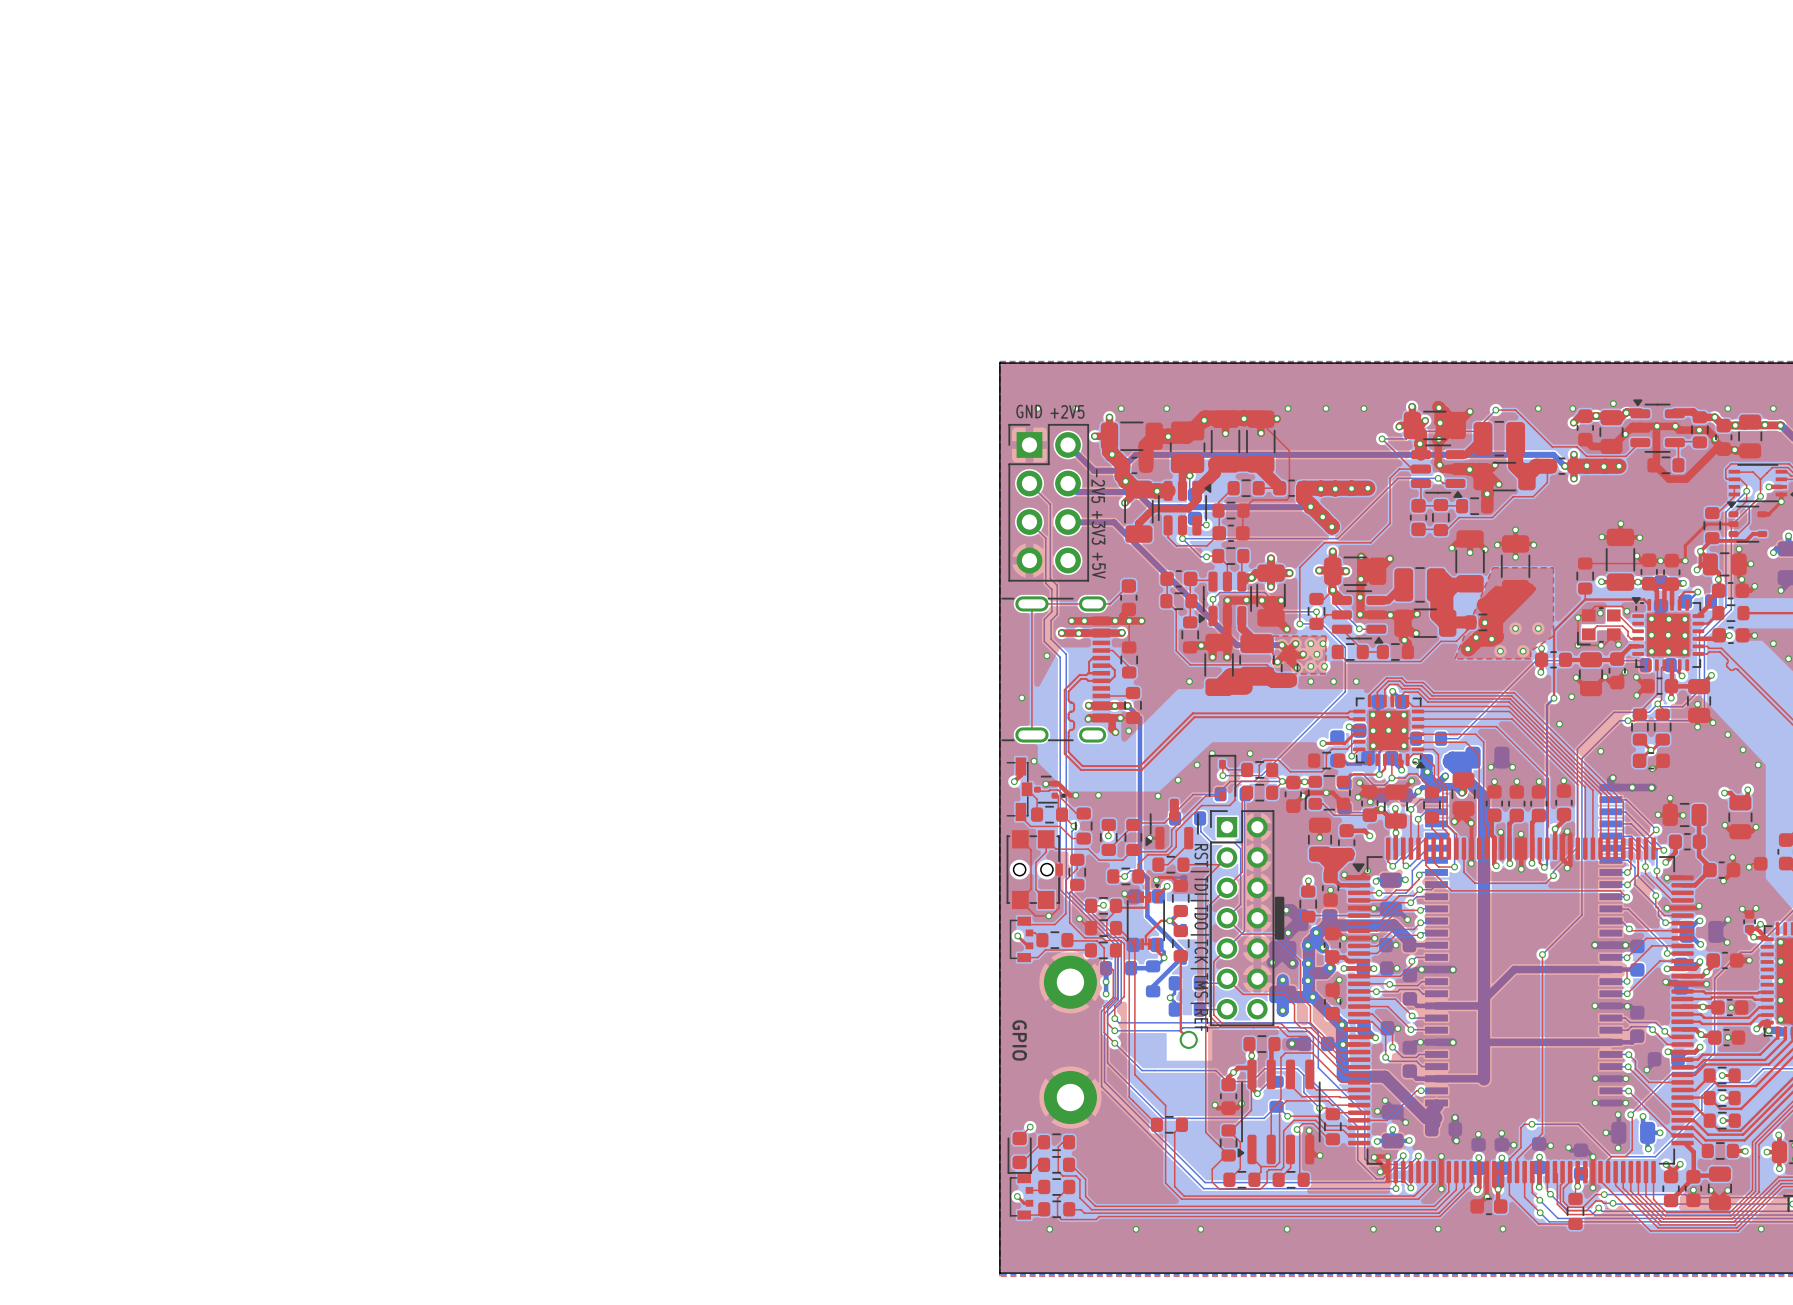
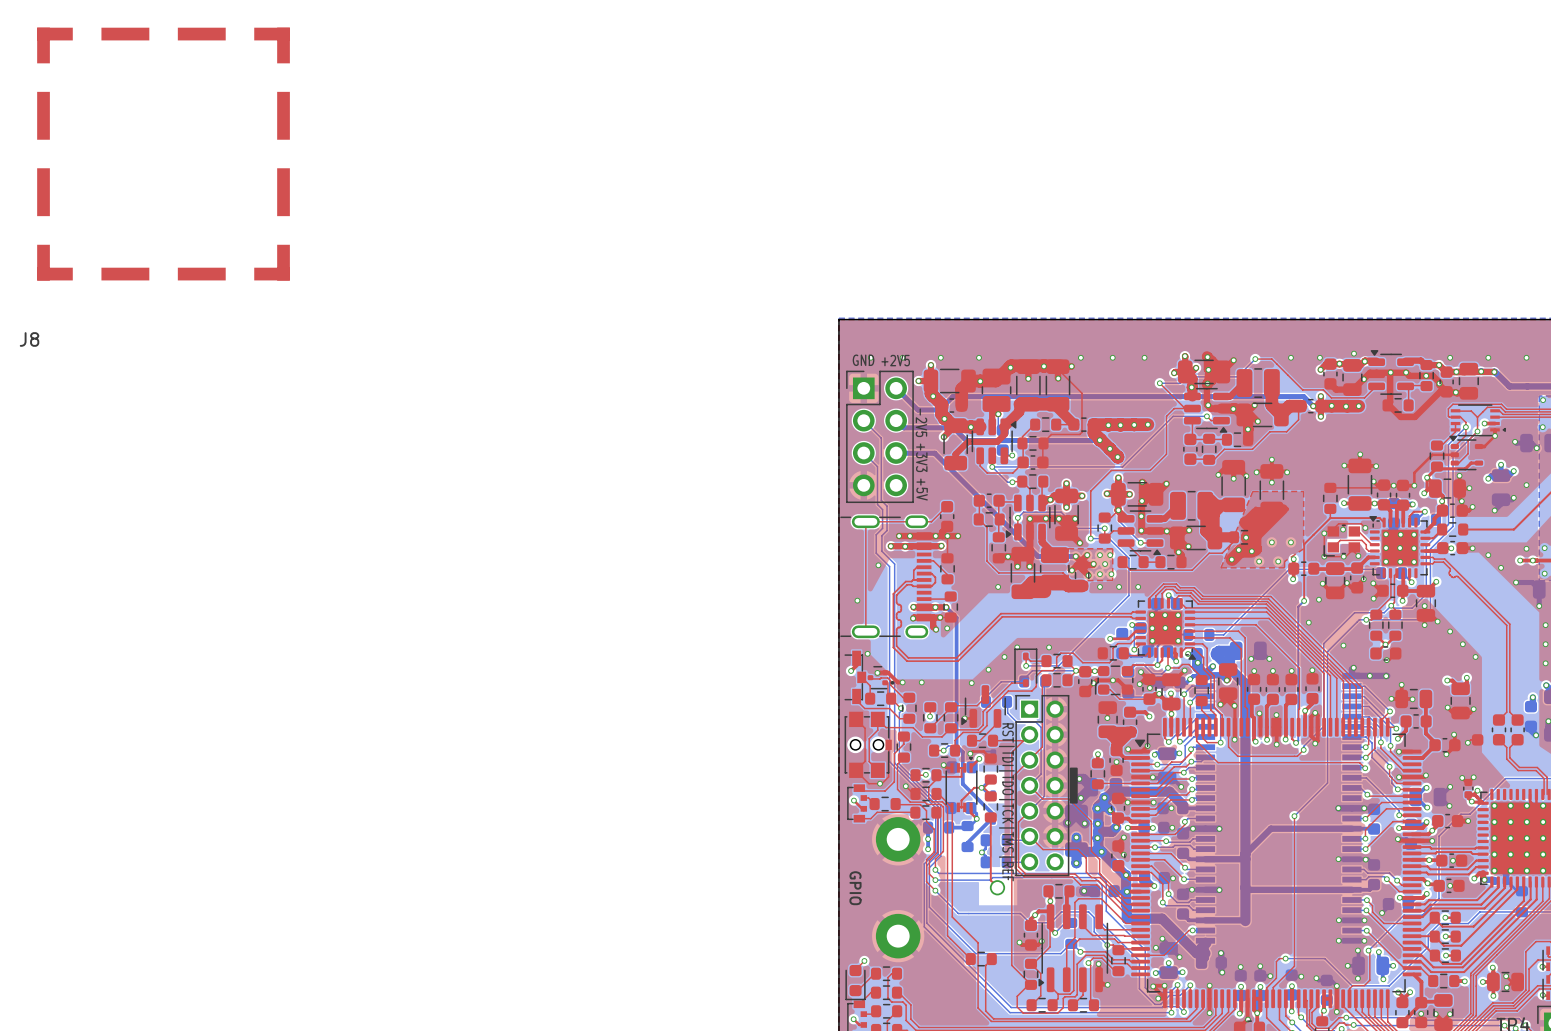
J8: none -> (163, 154)

